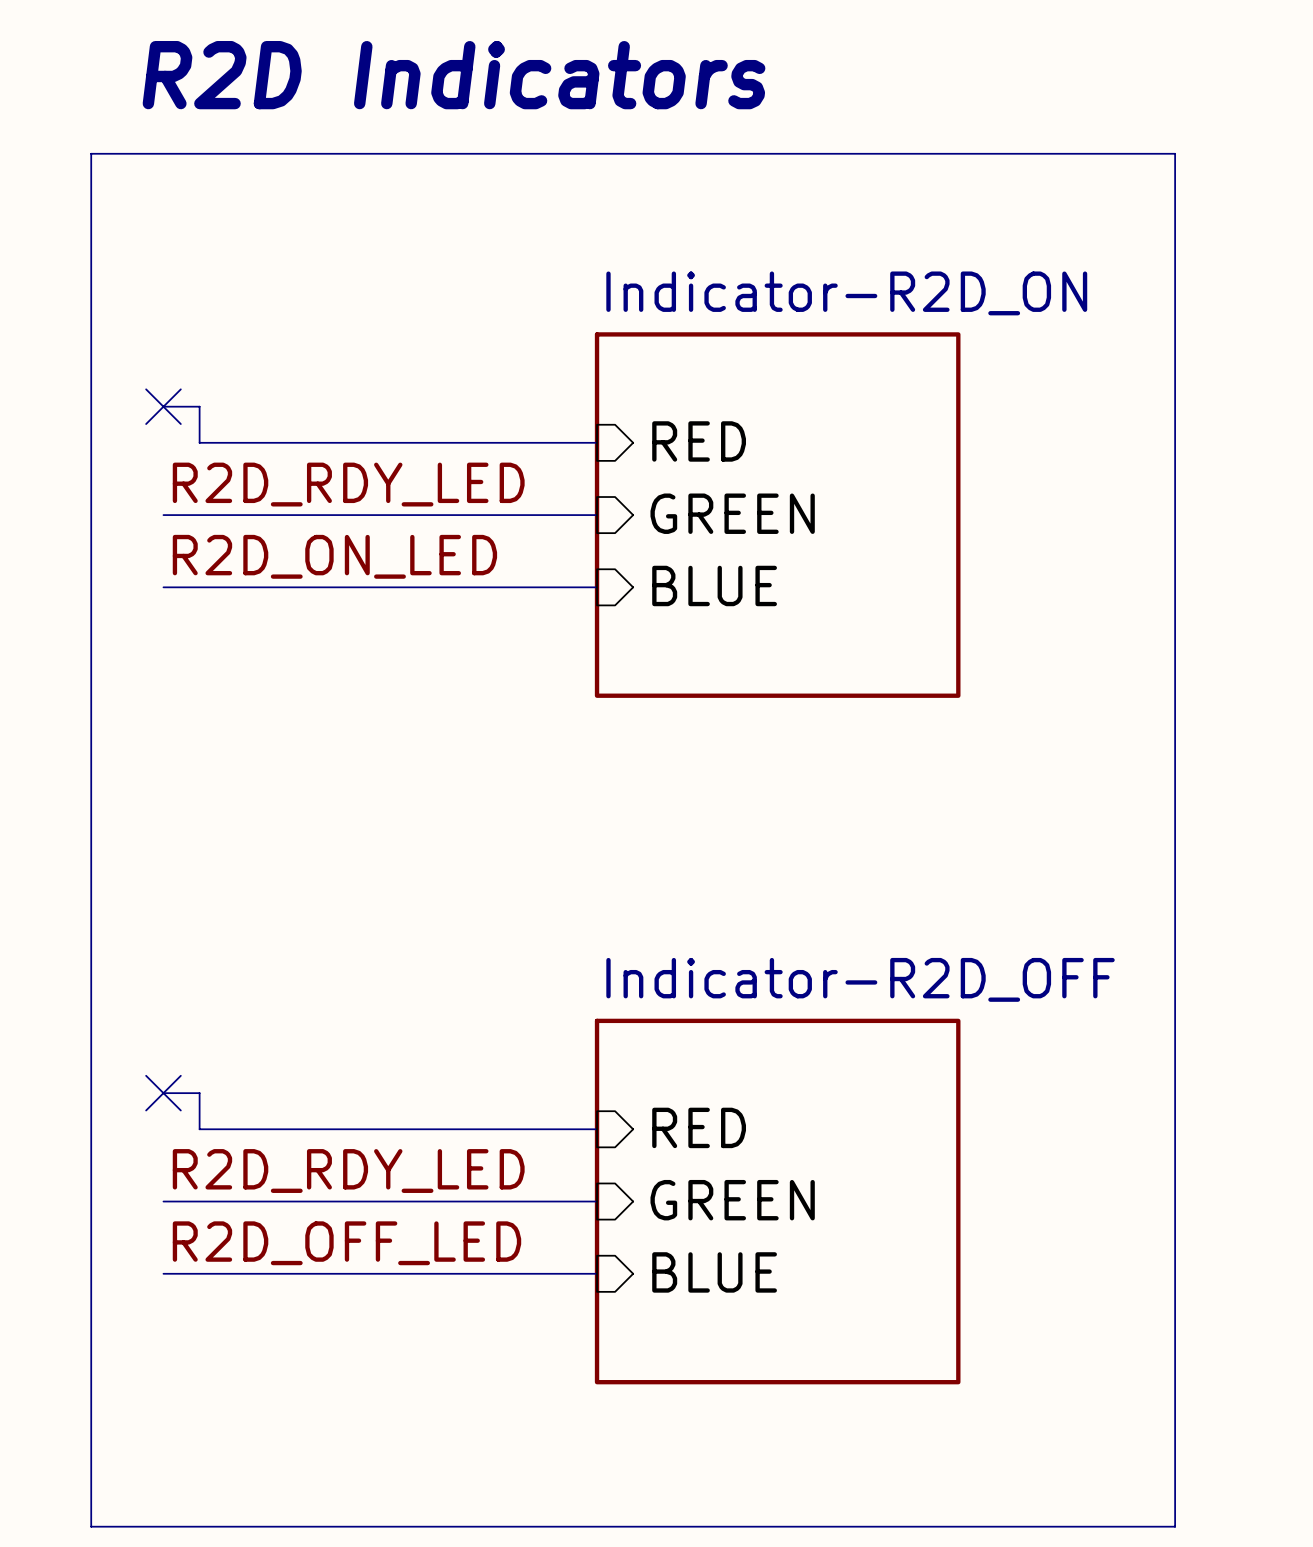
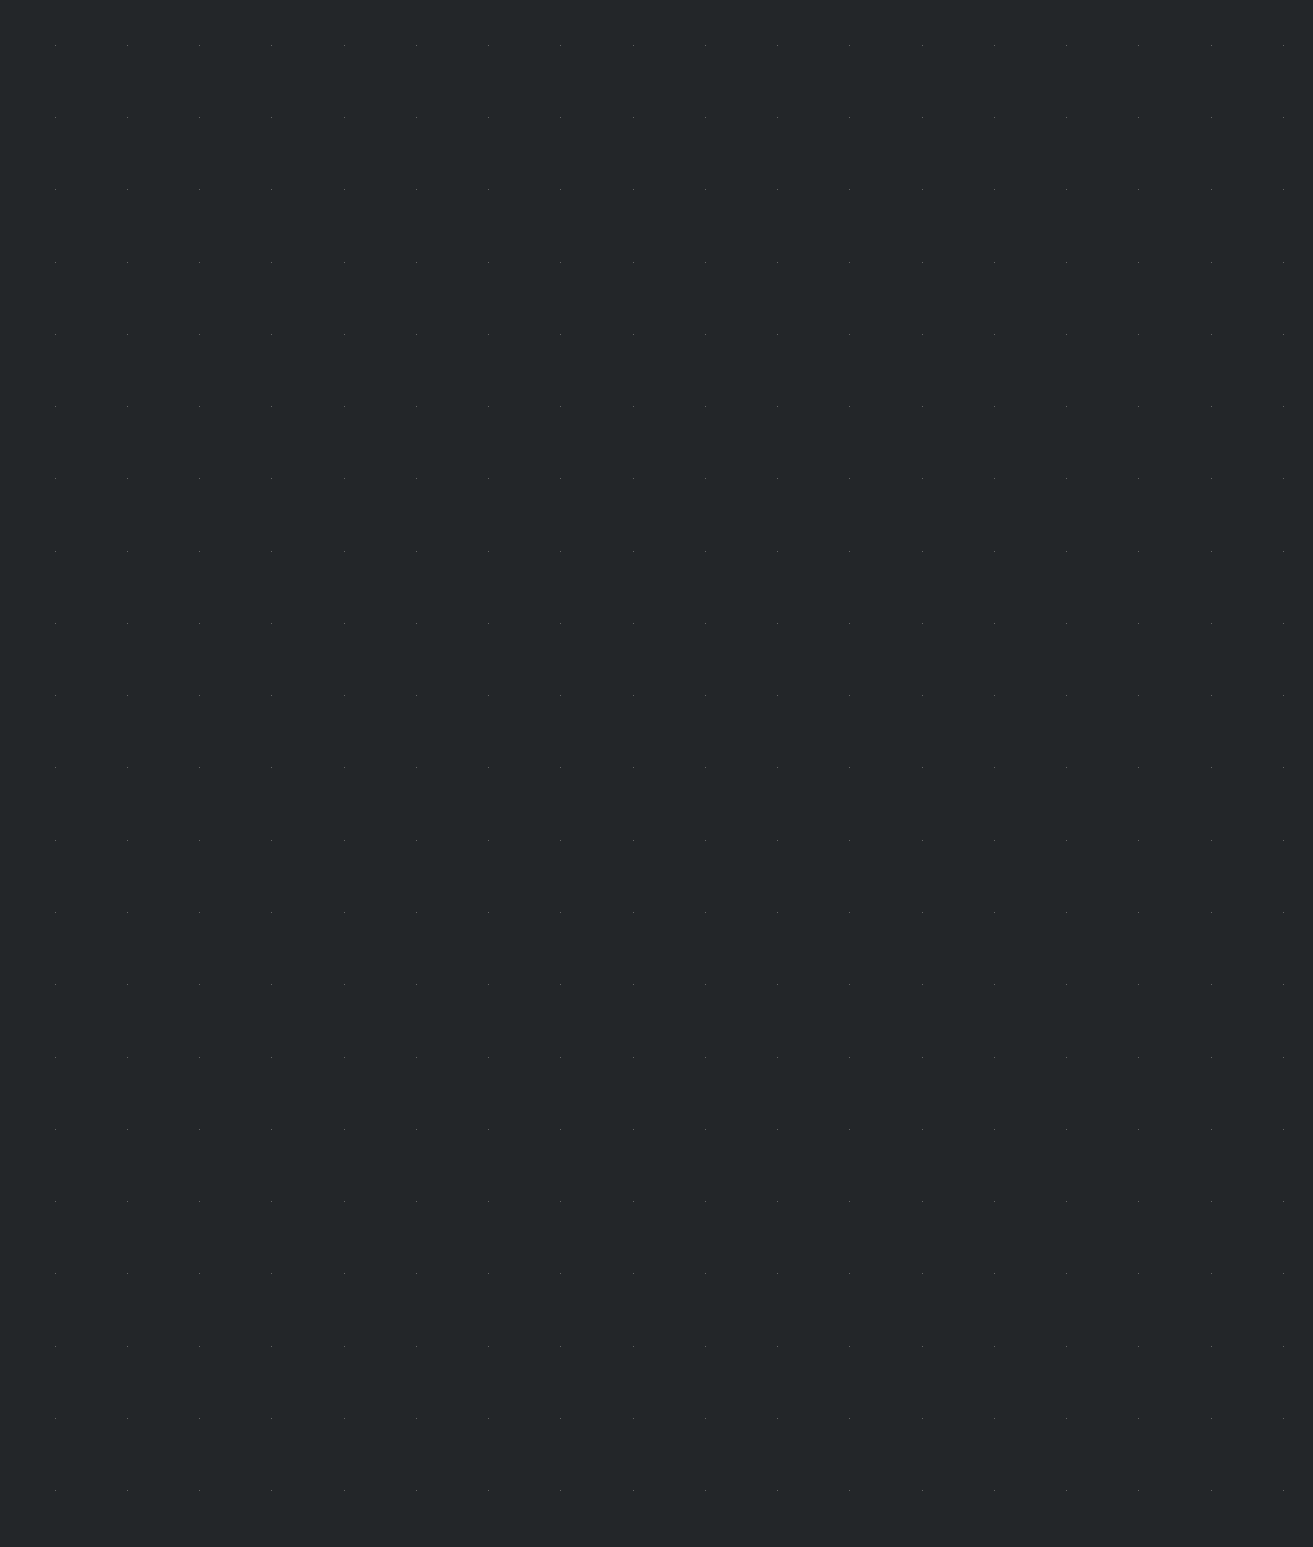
text: R2D Indicators (454, 75) -> none
line: (91, 153) (1175, 153) (1175, 1526) (91, 1526) (91, 153) -> none
wire: (163, 406) (199, 406) (199, 442) (597, 442) -> none
no-connect mark: (163, 406) -> none
sheet pin: RED (699, 441) -> none
label: R2D_RDY_LED (348, 484) -> none
sheet pin: GREEN (732, 513) -> none
wire: (163, 515) (597, 515) -> none
sheet Indicator-R2D_ON: (777, 515) -> none
label: R2D_ON_LED (334, 556) -> none
sheet pin: BLUE (714, 585) -> none
wire: (163, 587) (597, 587) -> none
wire: (163, 1093) (199, 1093) (199, 1129) (597, 1129) -> none
no-connect mark: (163, 1093) -> none
sheet pin: RED (699, 1127) -> none
label: R2D_RDY_LED (348, 1171) -> none
sheet pin: GREEN (732, 1200) -> none
wire: (163, 1201) (597, 1201) -> none
sheet Indicator-R2D_OFF: (777, 1201) -> none
label: R2D_OFF_LED (346, 1243) -> none
sheet pin: BLUE (714, 1272) -> none
wire: (163, 1273) (597, 1273) -> none

